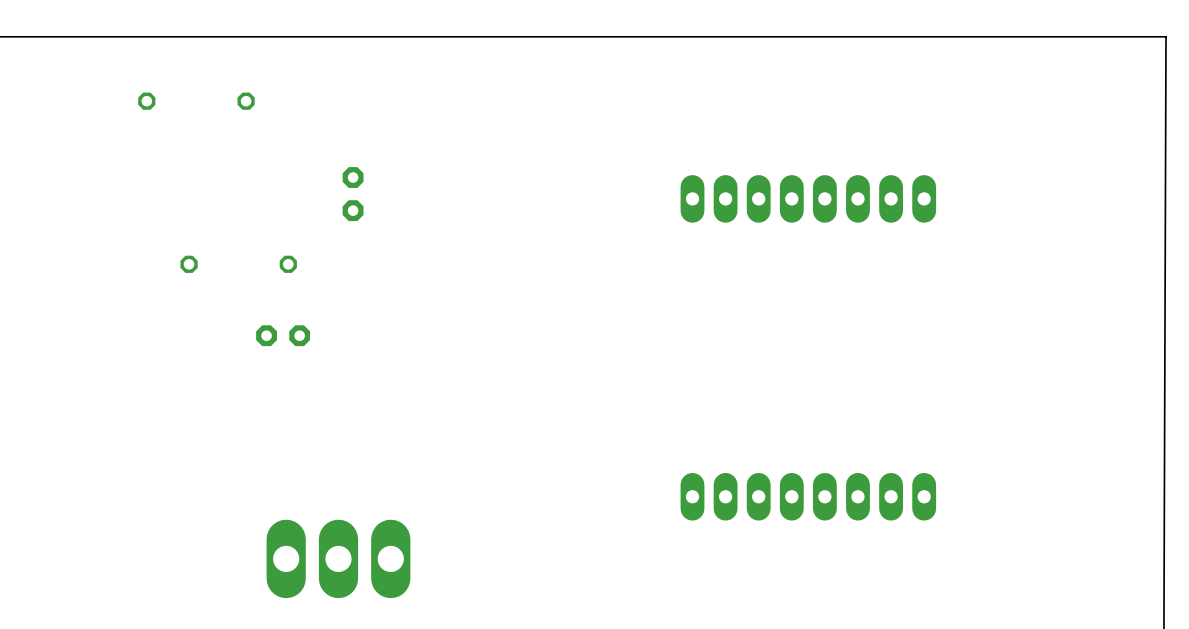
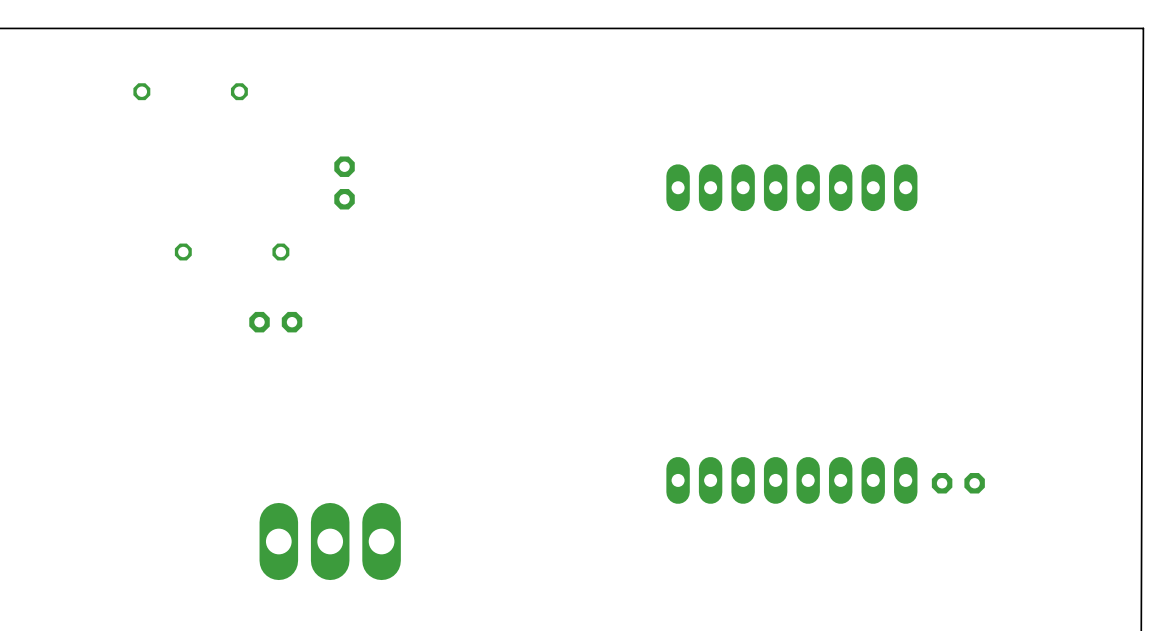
part: none -> (958, 483)

